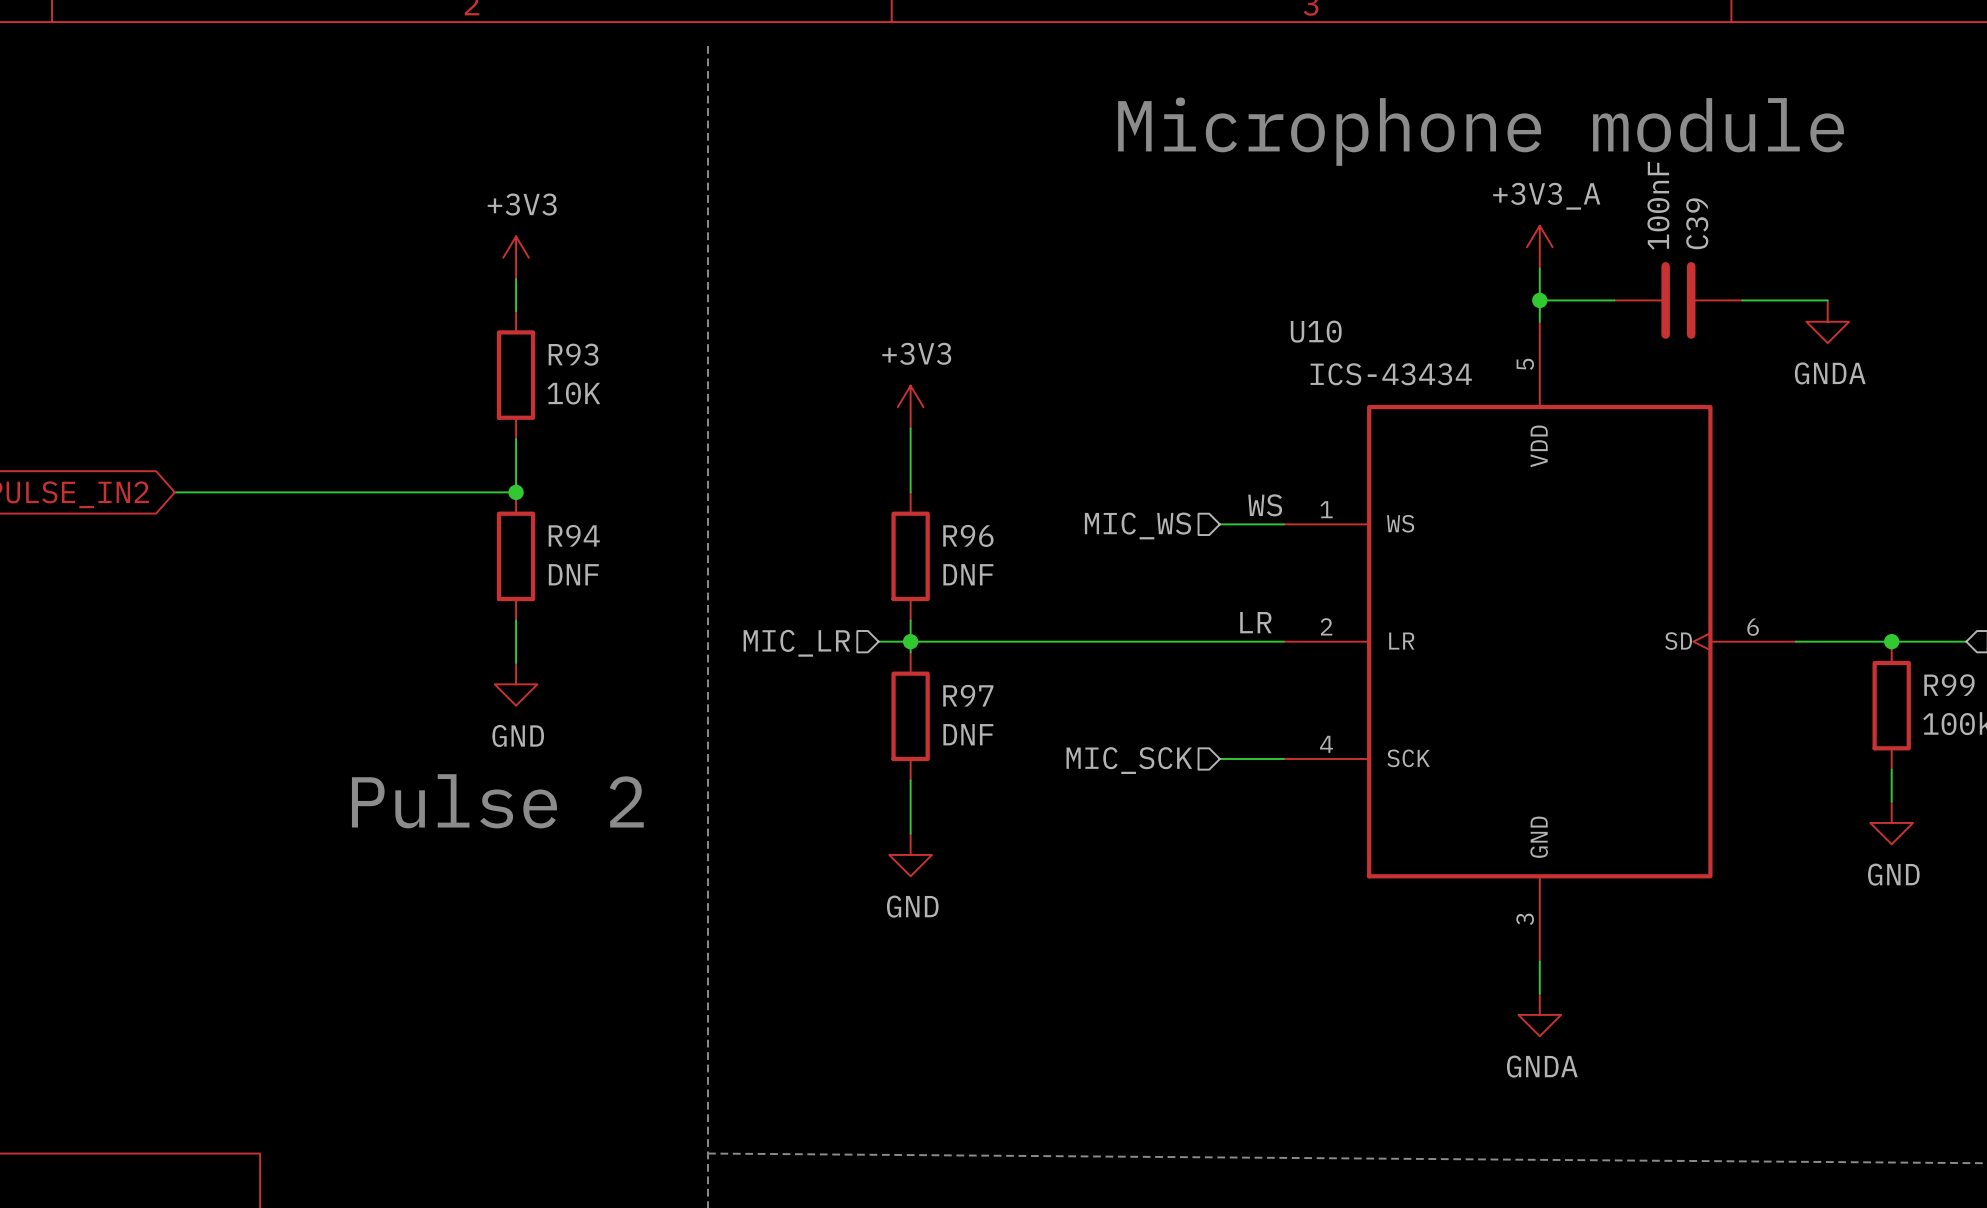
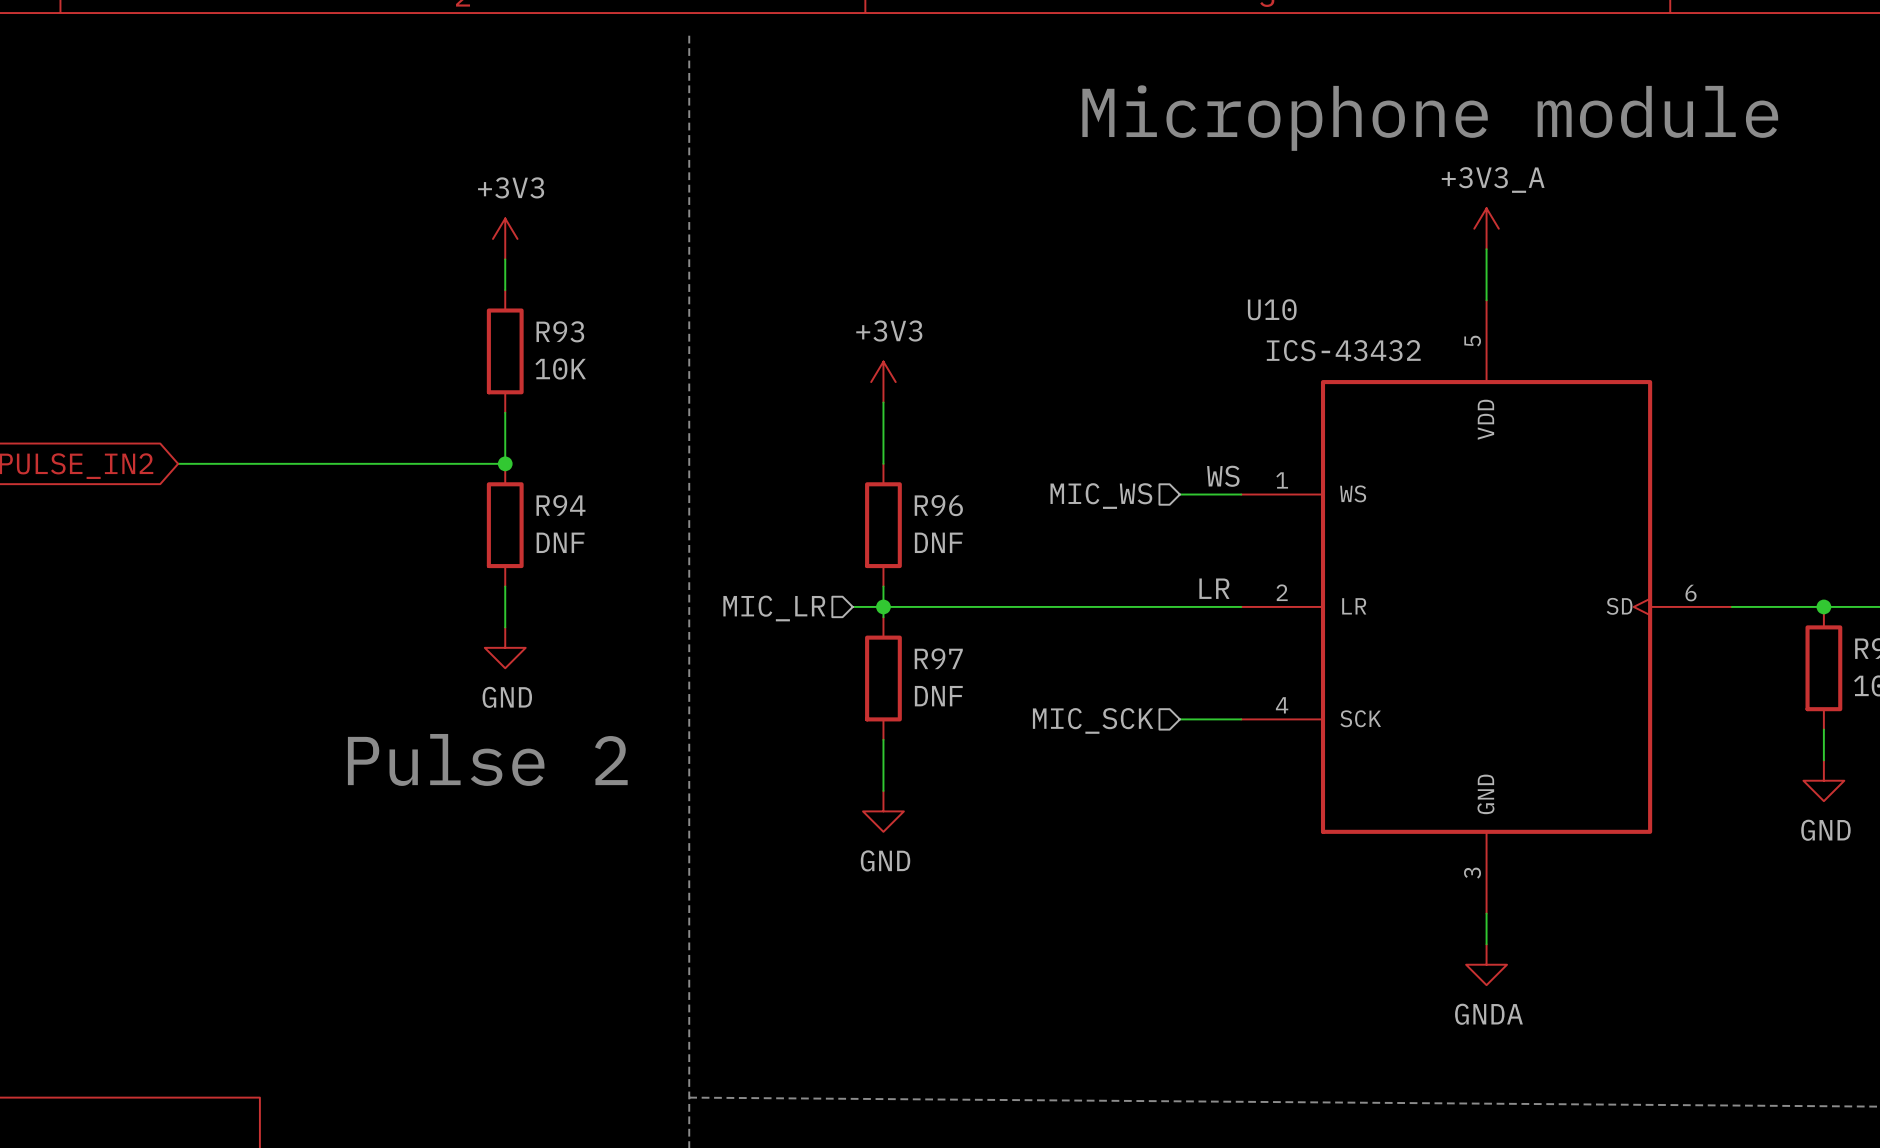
wire: (1539, 300) (1614, 300) -> none
junction: (1539, 300) -> none
C39: 100nF (1678, 300) -> none
wire: (1742, 300) (1827, 300) -> none
power symbol: GNDA (1827, 321) -> none
U10 value: ICS-43434 (1391, 374) -> ICS-43432 (1343, 350)

